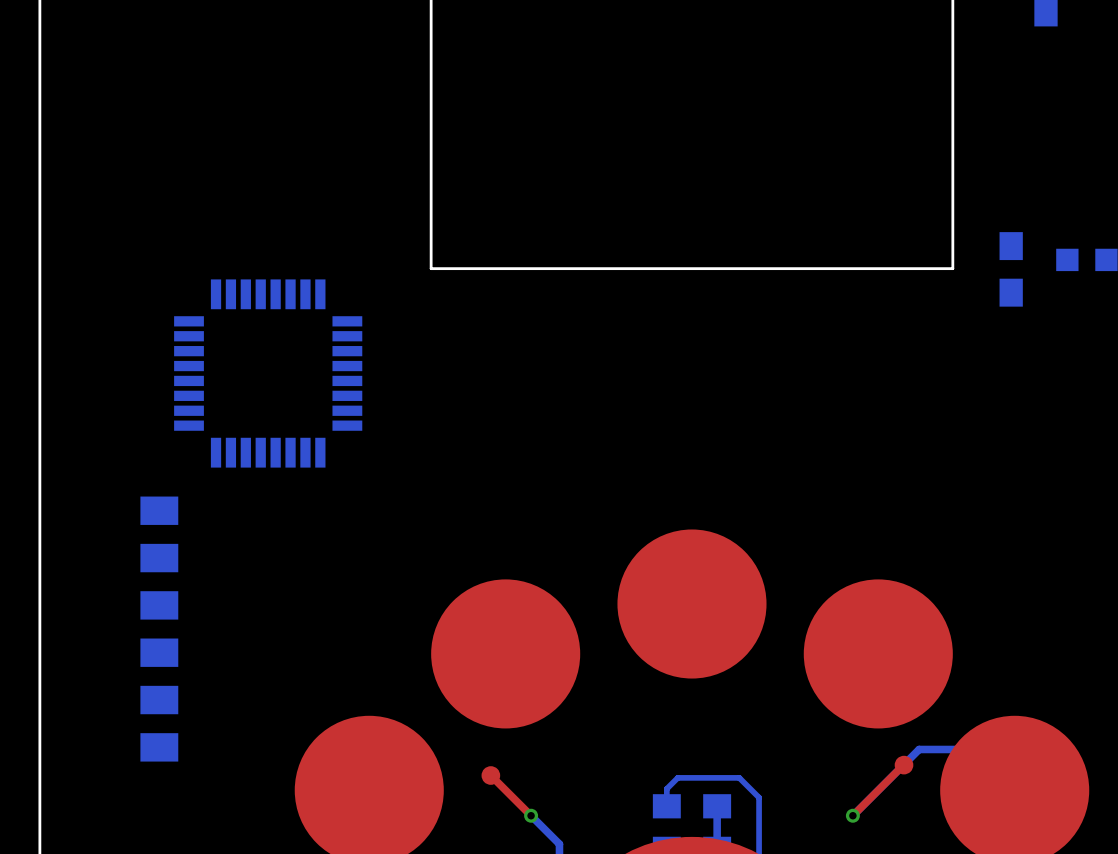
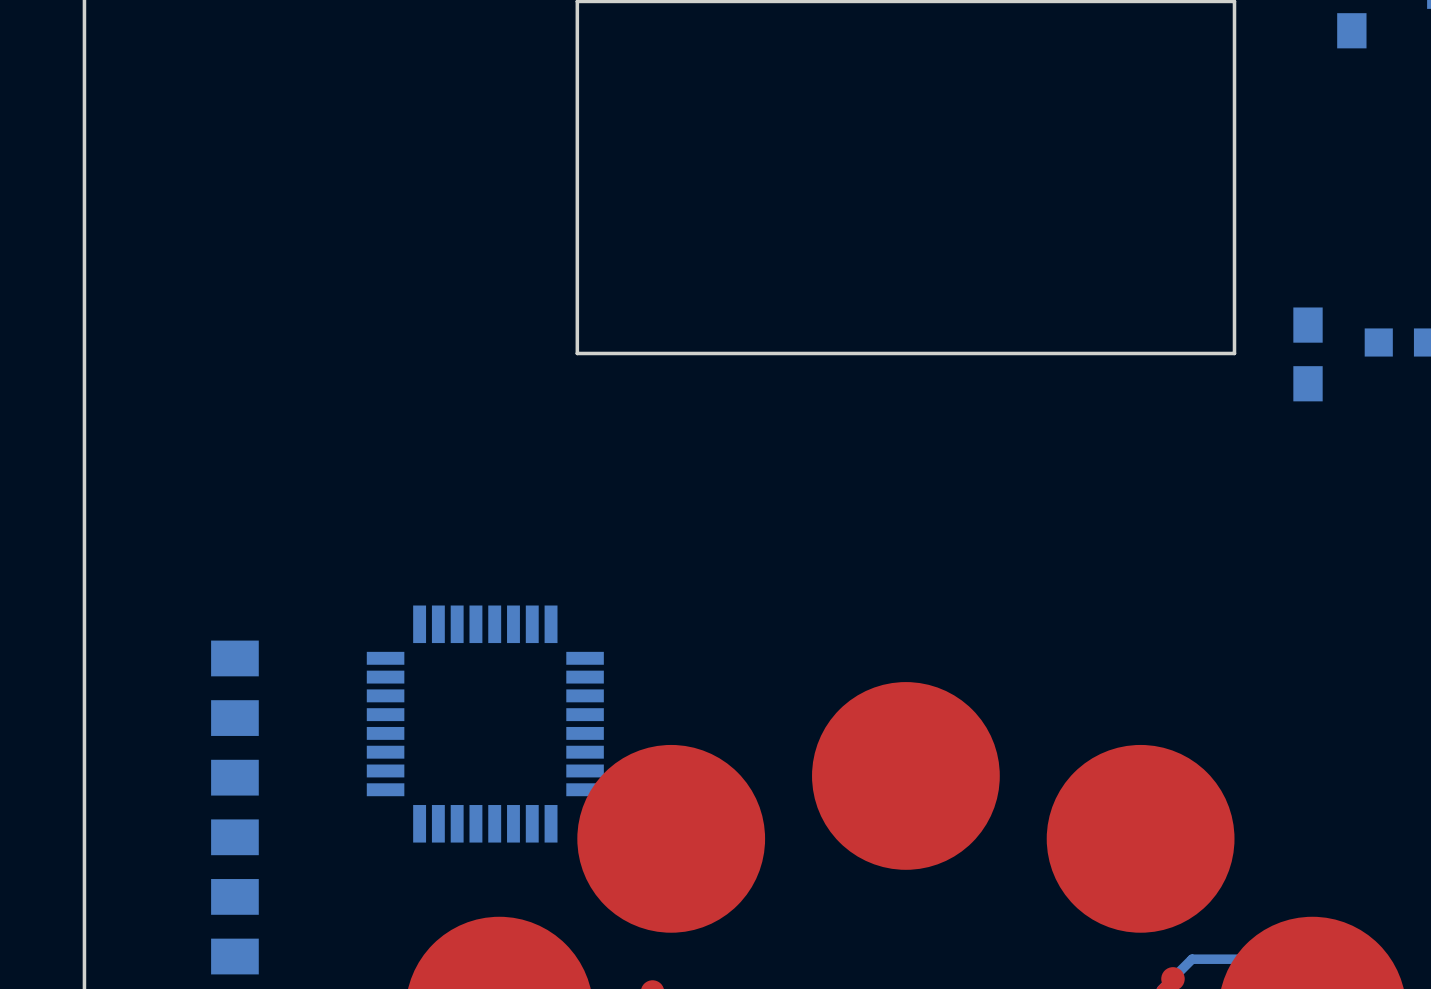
part position: (268, 373) -> (485, 724)

